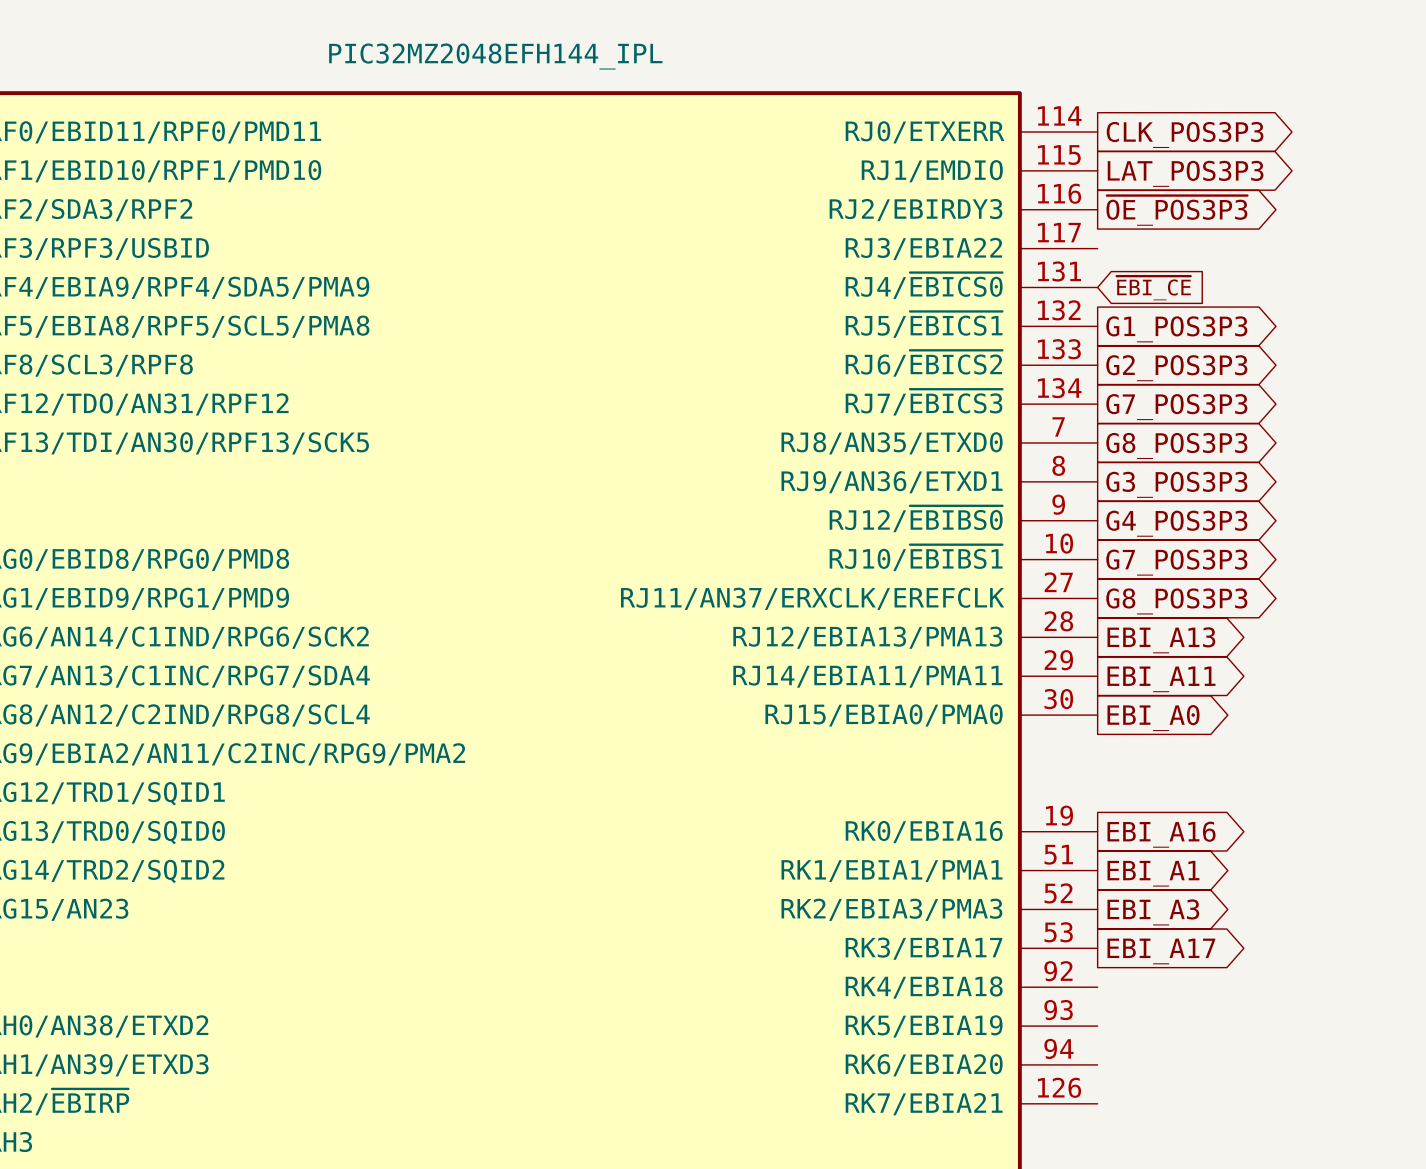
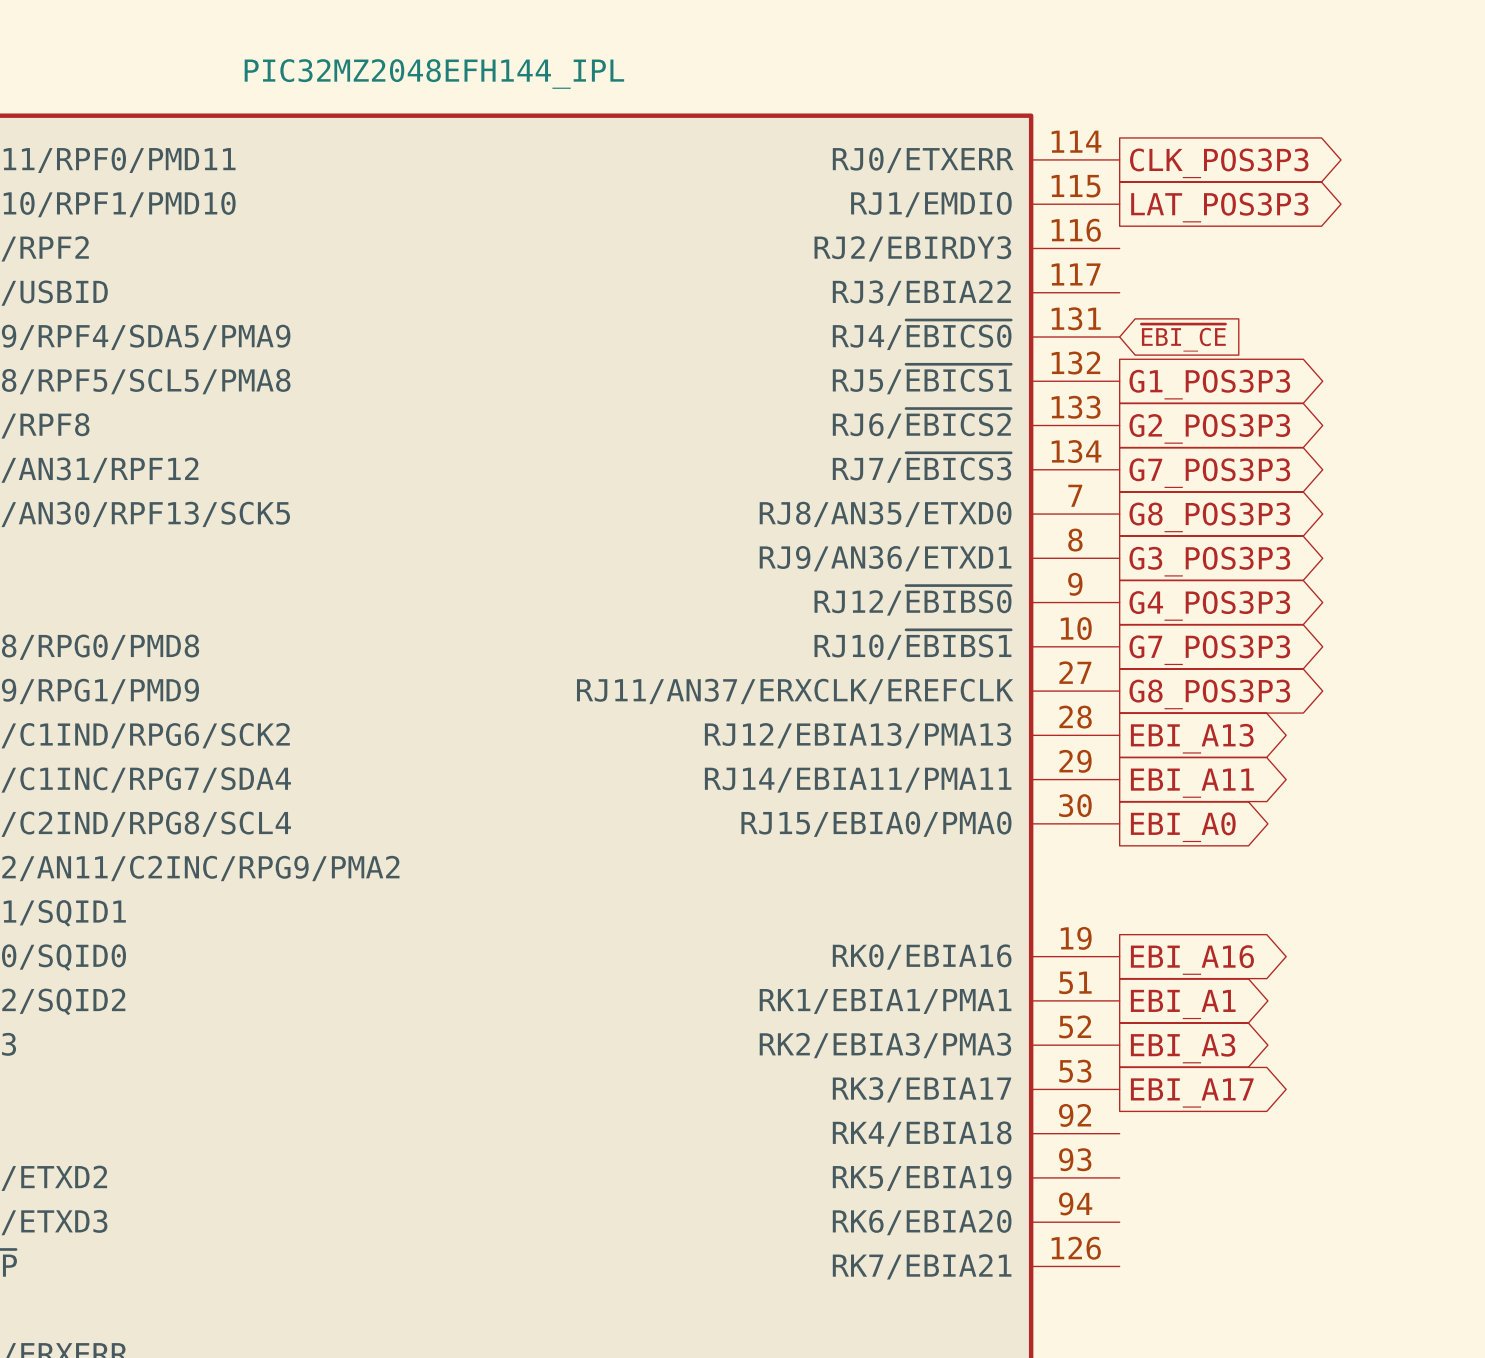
global label: ~{OE_POS3P3} (1176, 210) -> none

